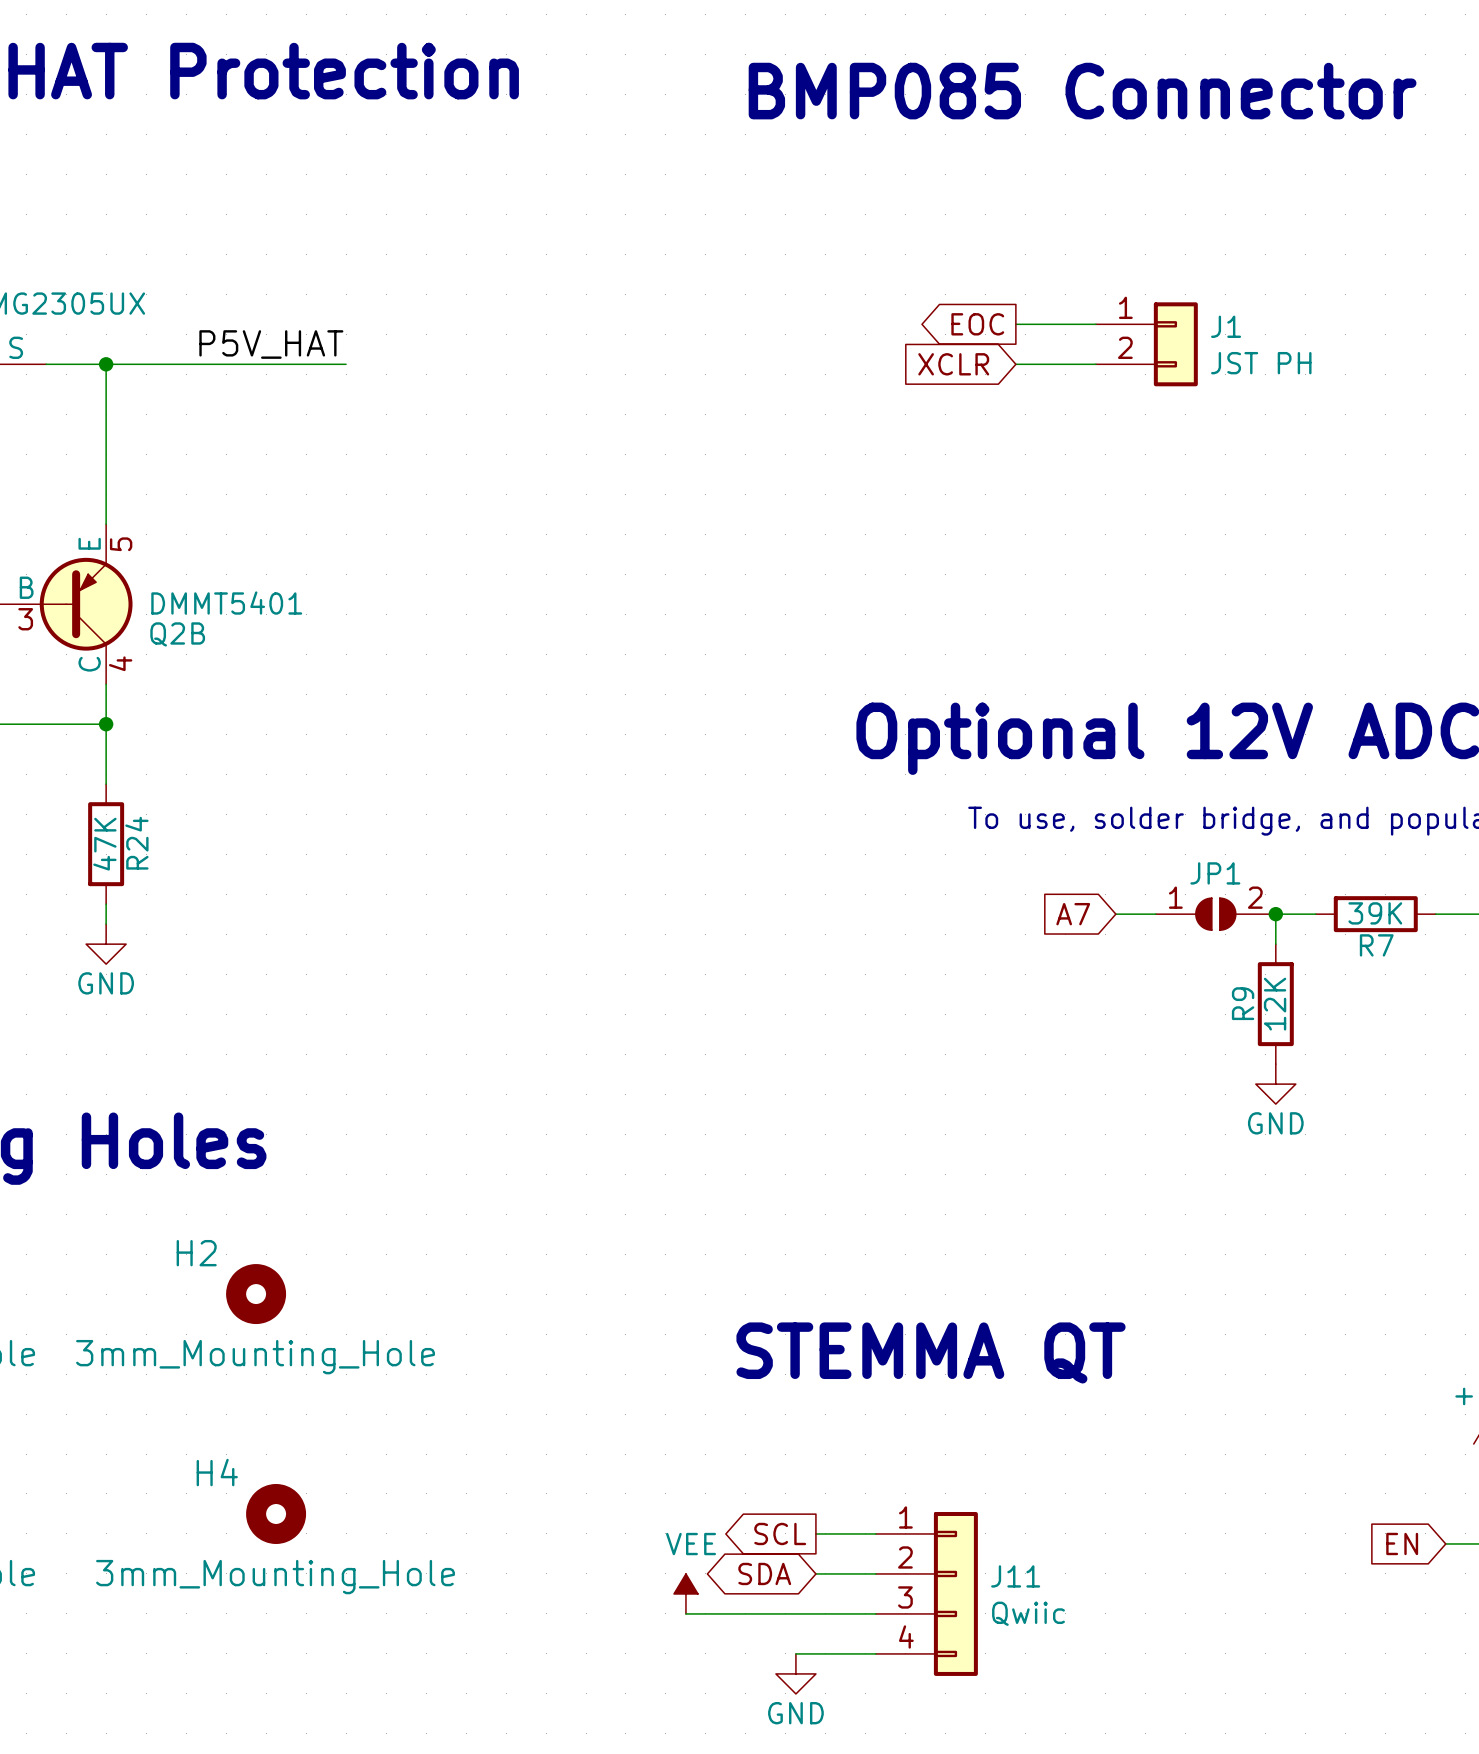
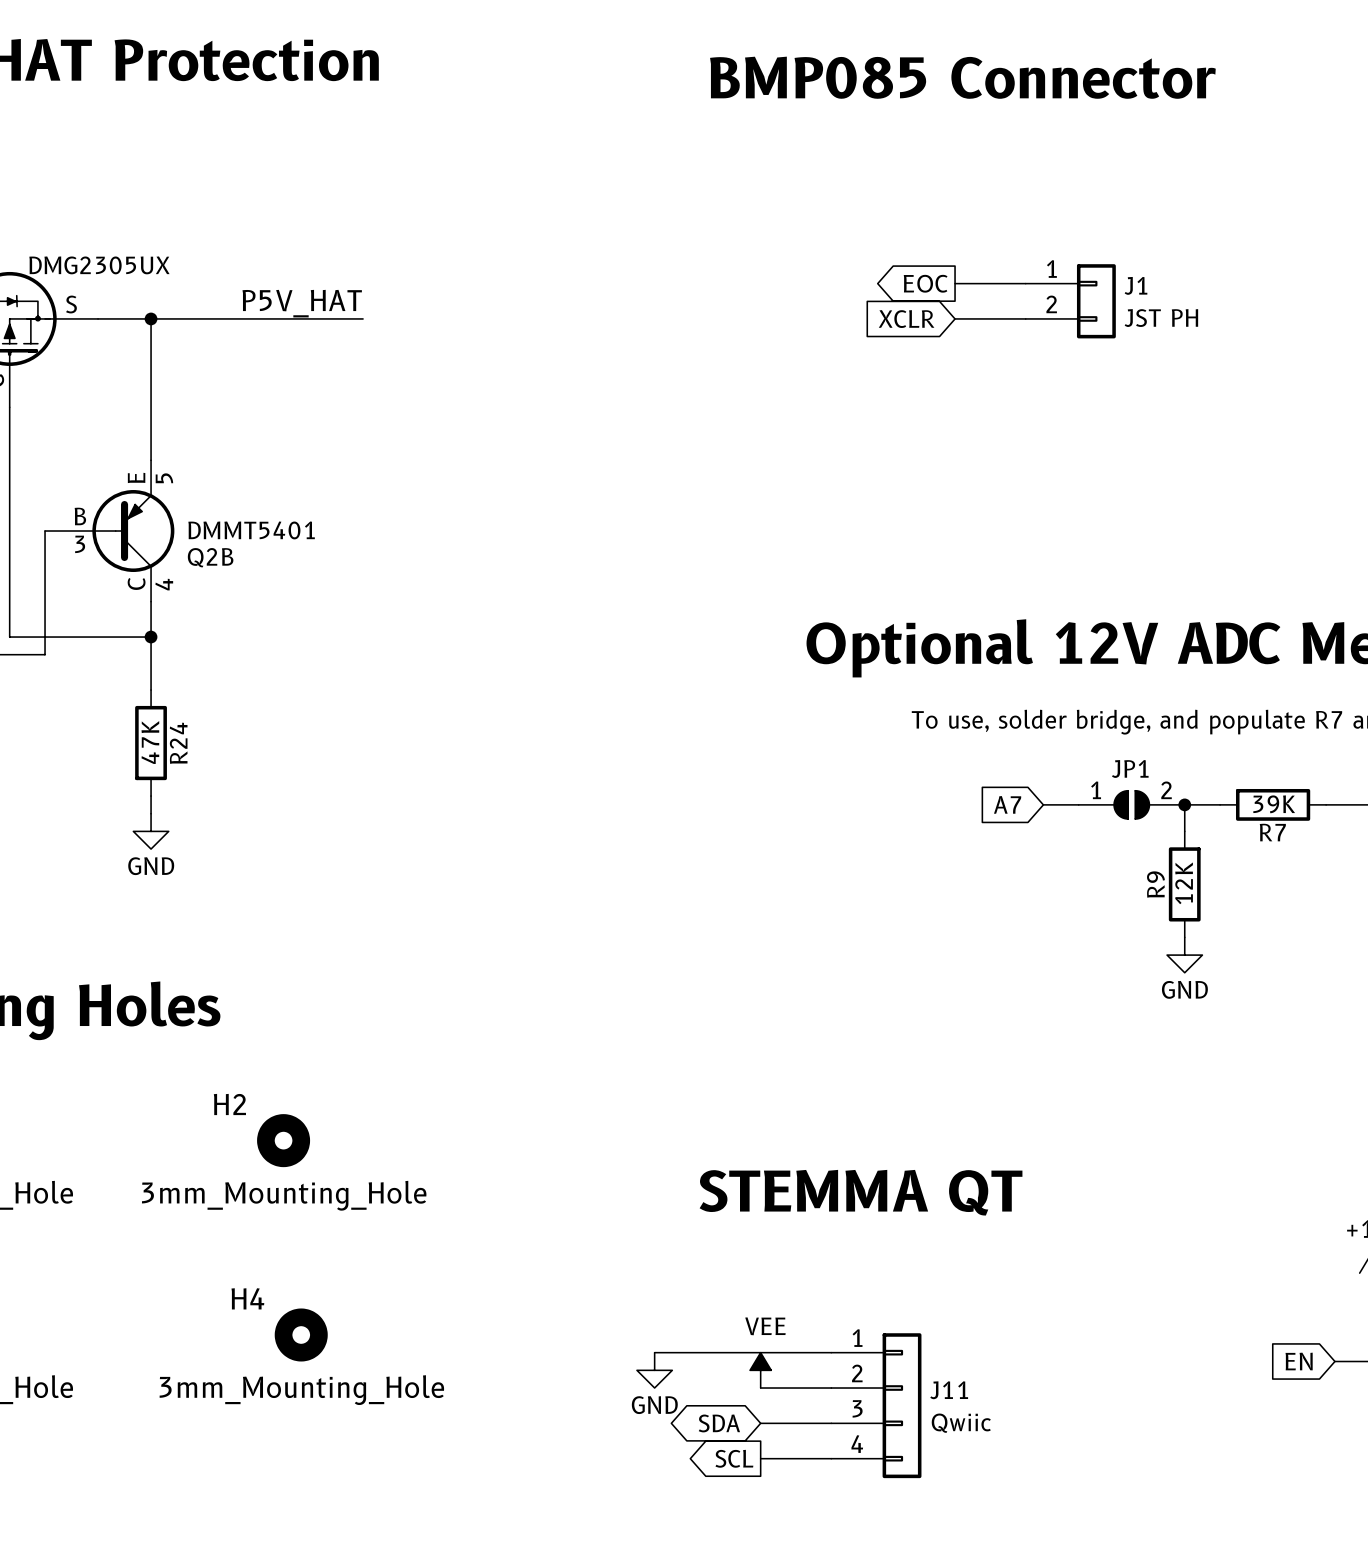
wire: none -> (654, 1352) (778, 1352)
global label position: SCL (780, 1533) -> SCL (734, 1458)
global label position: SDA (764, 1573) -> SDA (719, 1423)
wire: none -> (760, 1388) (778, 1388)
power symbol position: VEE (685, 1593) -> VEE (760, 1370)
wire: (685, 1613) (795, 1613) -> none
power symbol position: GND (795, 1673) -> GND (654, 1370)

